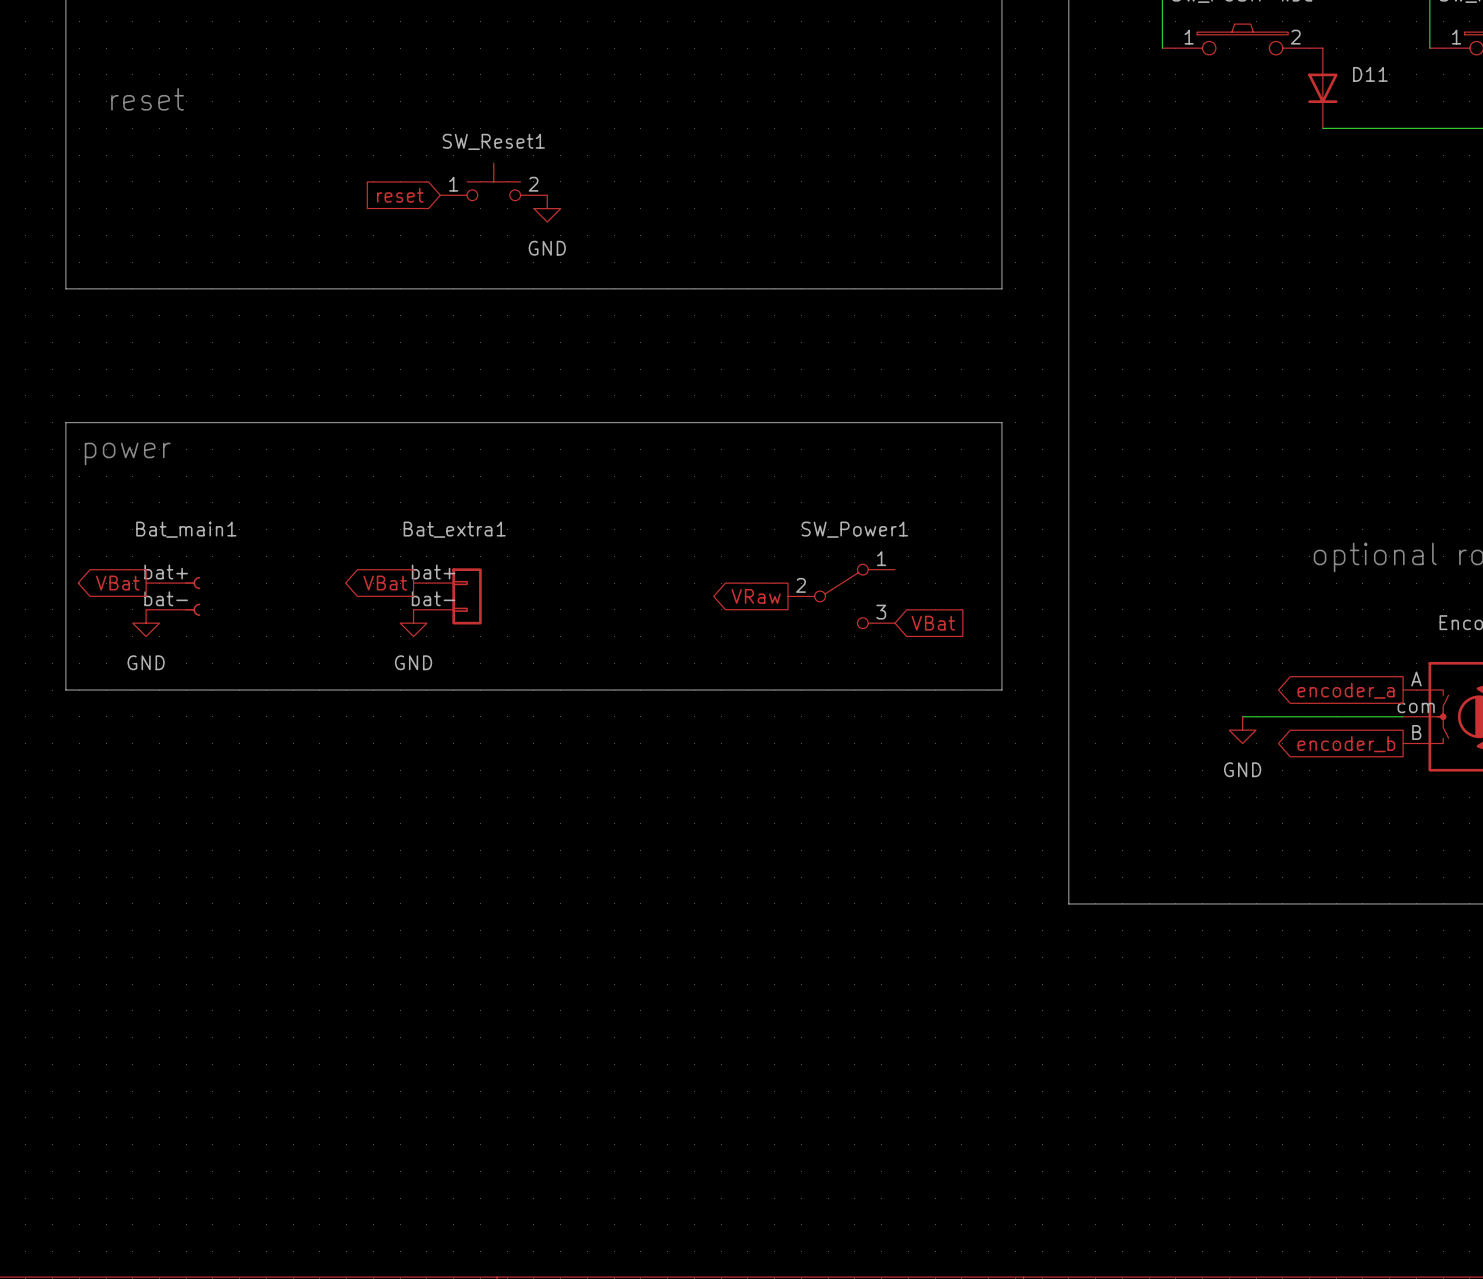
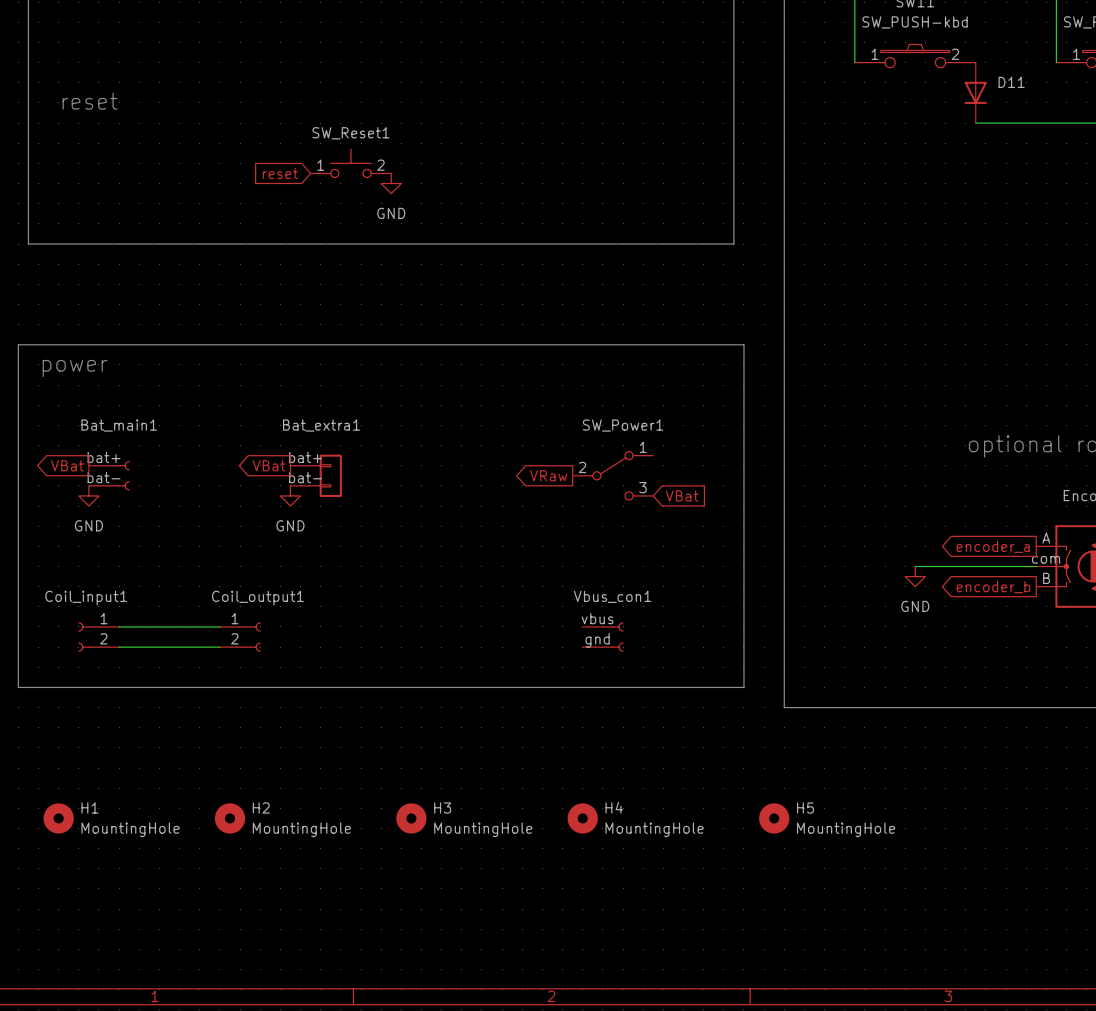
line: (65, 422) (65, 690) (1001, 690) (1001, 422) -> (28, 344) (18, 344) (18, 687) (743, 687) (743, 344) (733, 344)
wire: none -> (119, 626) (219, 626)
Coil_input1: none -> (98, 637)
Coil_output1: none -> (240, 637)
Vbus_con1: none -> (603, 637)
wire: none -> (119, 647) (219, 647)
H1: none -> MountingHole (58, 818)
H2: none -> MountingHole (230, 818)
H3: none -> MountingHole (411, 818)
H4: none -> MountingHole (582, 818)
H5: none -> MountingHole (774, 818)

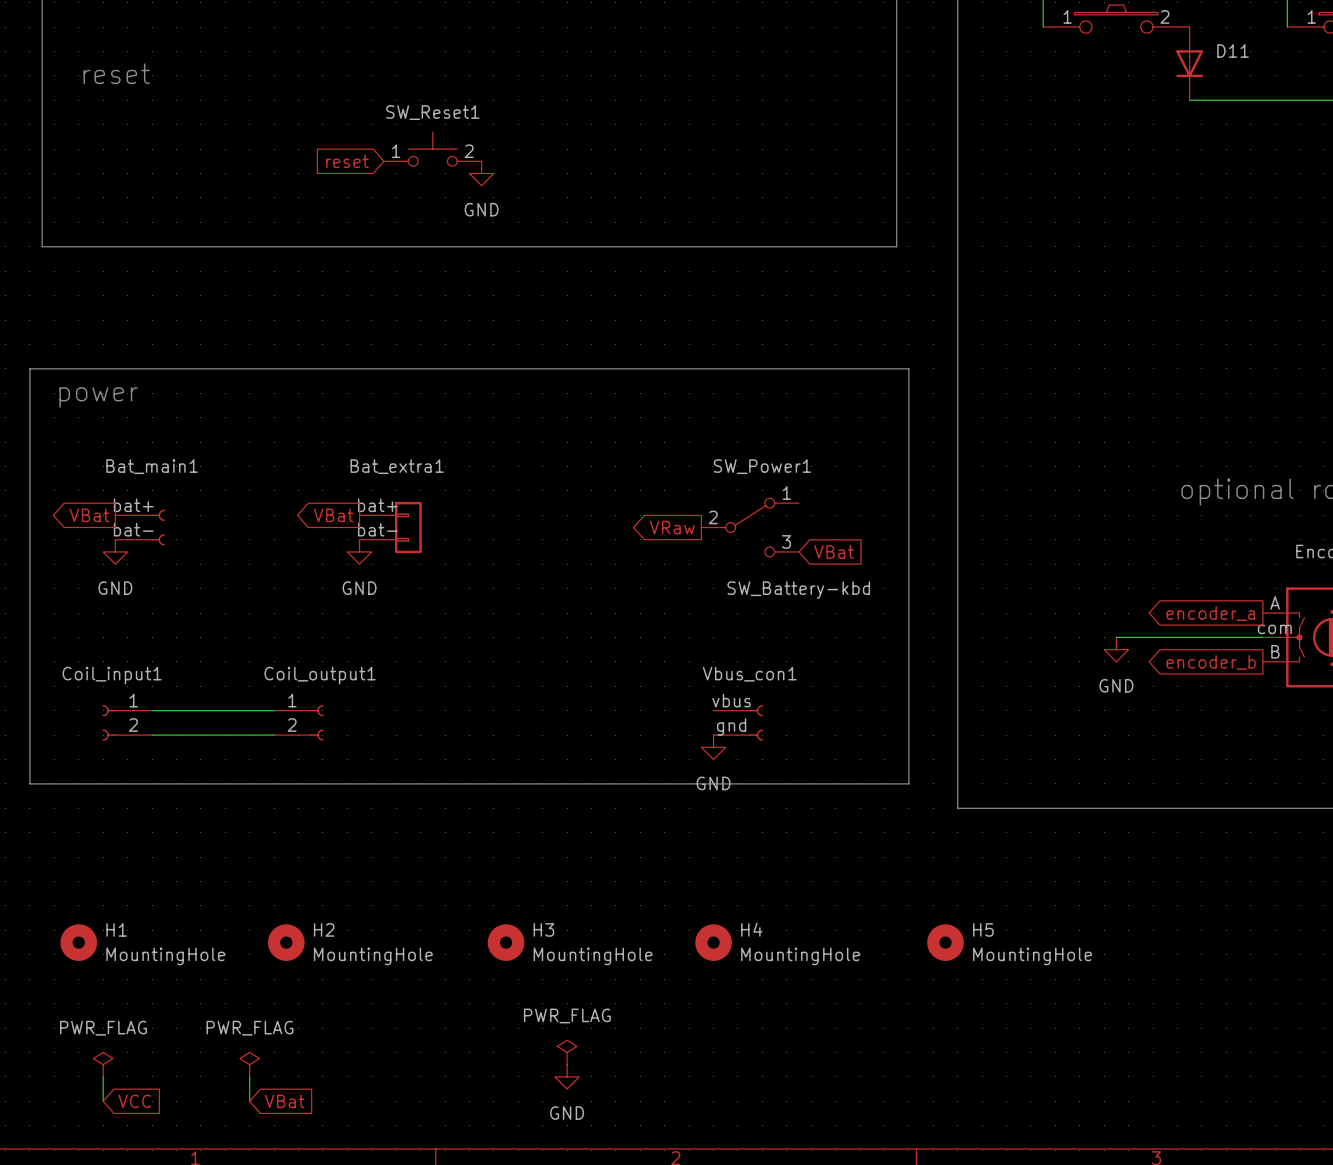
SW_Power1 value: none -> SW_Battery-kbd (798, 590)
power symbol: none -> GND (713, 747)
power symbol: none -> PWR_FLAG (567, 1052)
power symbol: none -> PWR_FLAG (103, 1064)
power symbol: none -> PWR_FLAG (249, 1064)
wire: none -> (103, 1076) (103, 1101)
wire: none -> (249, 1076) (249, 1101)
power symbol: none -> GND (567, 1076)
global label: none -> VCC (134, 1101)
global label: none -> VBat (284, 1101)

